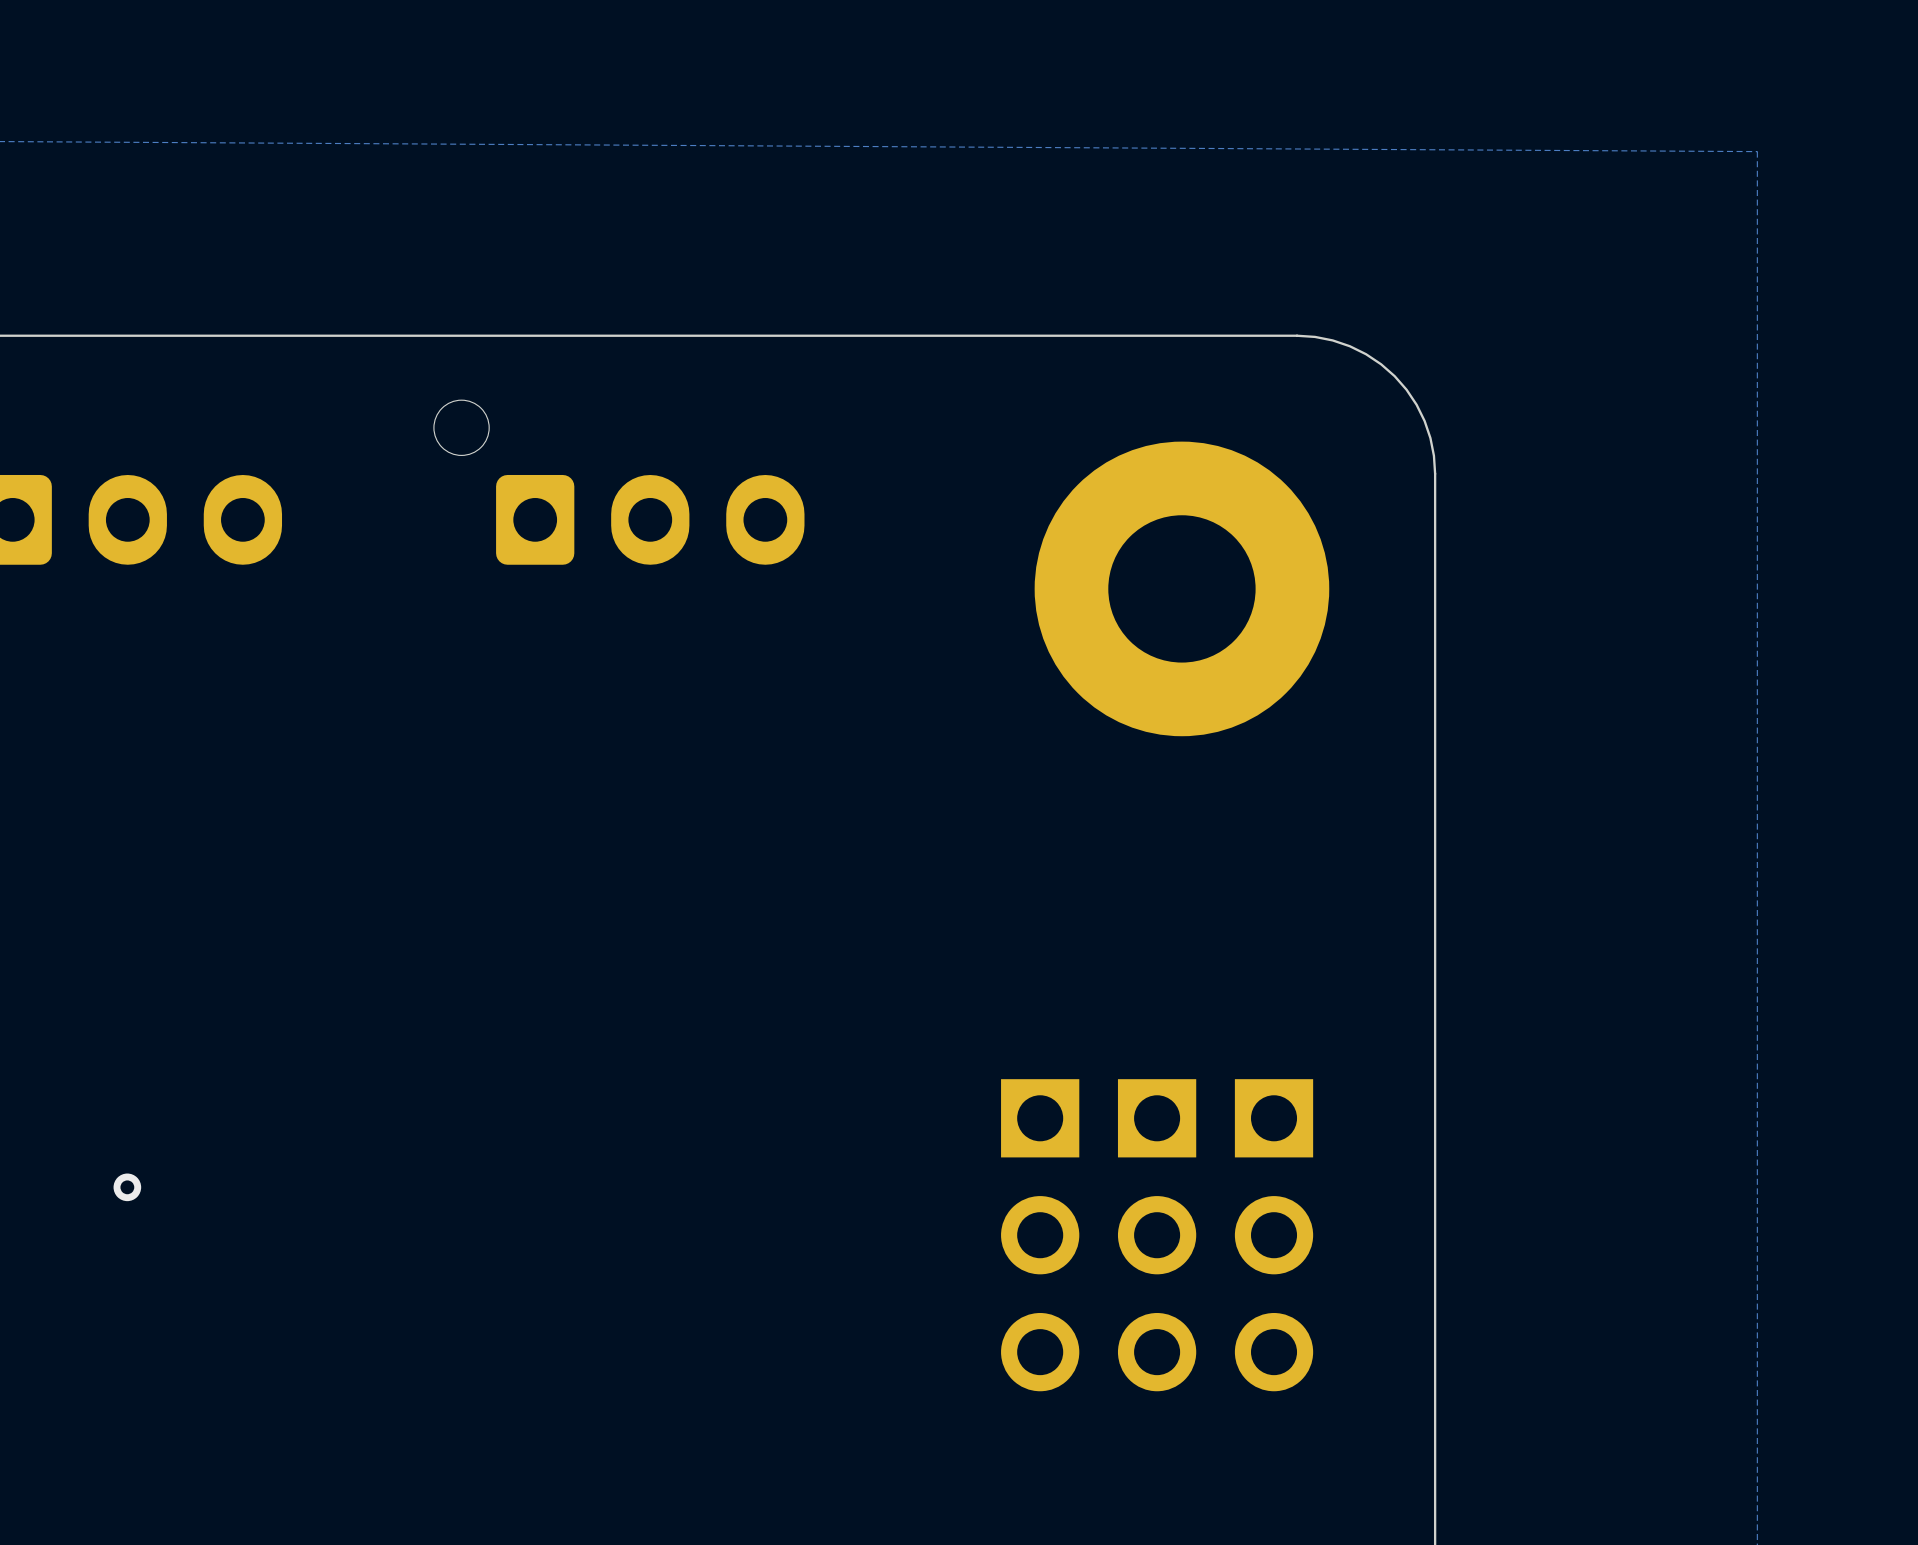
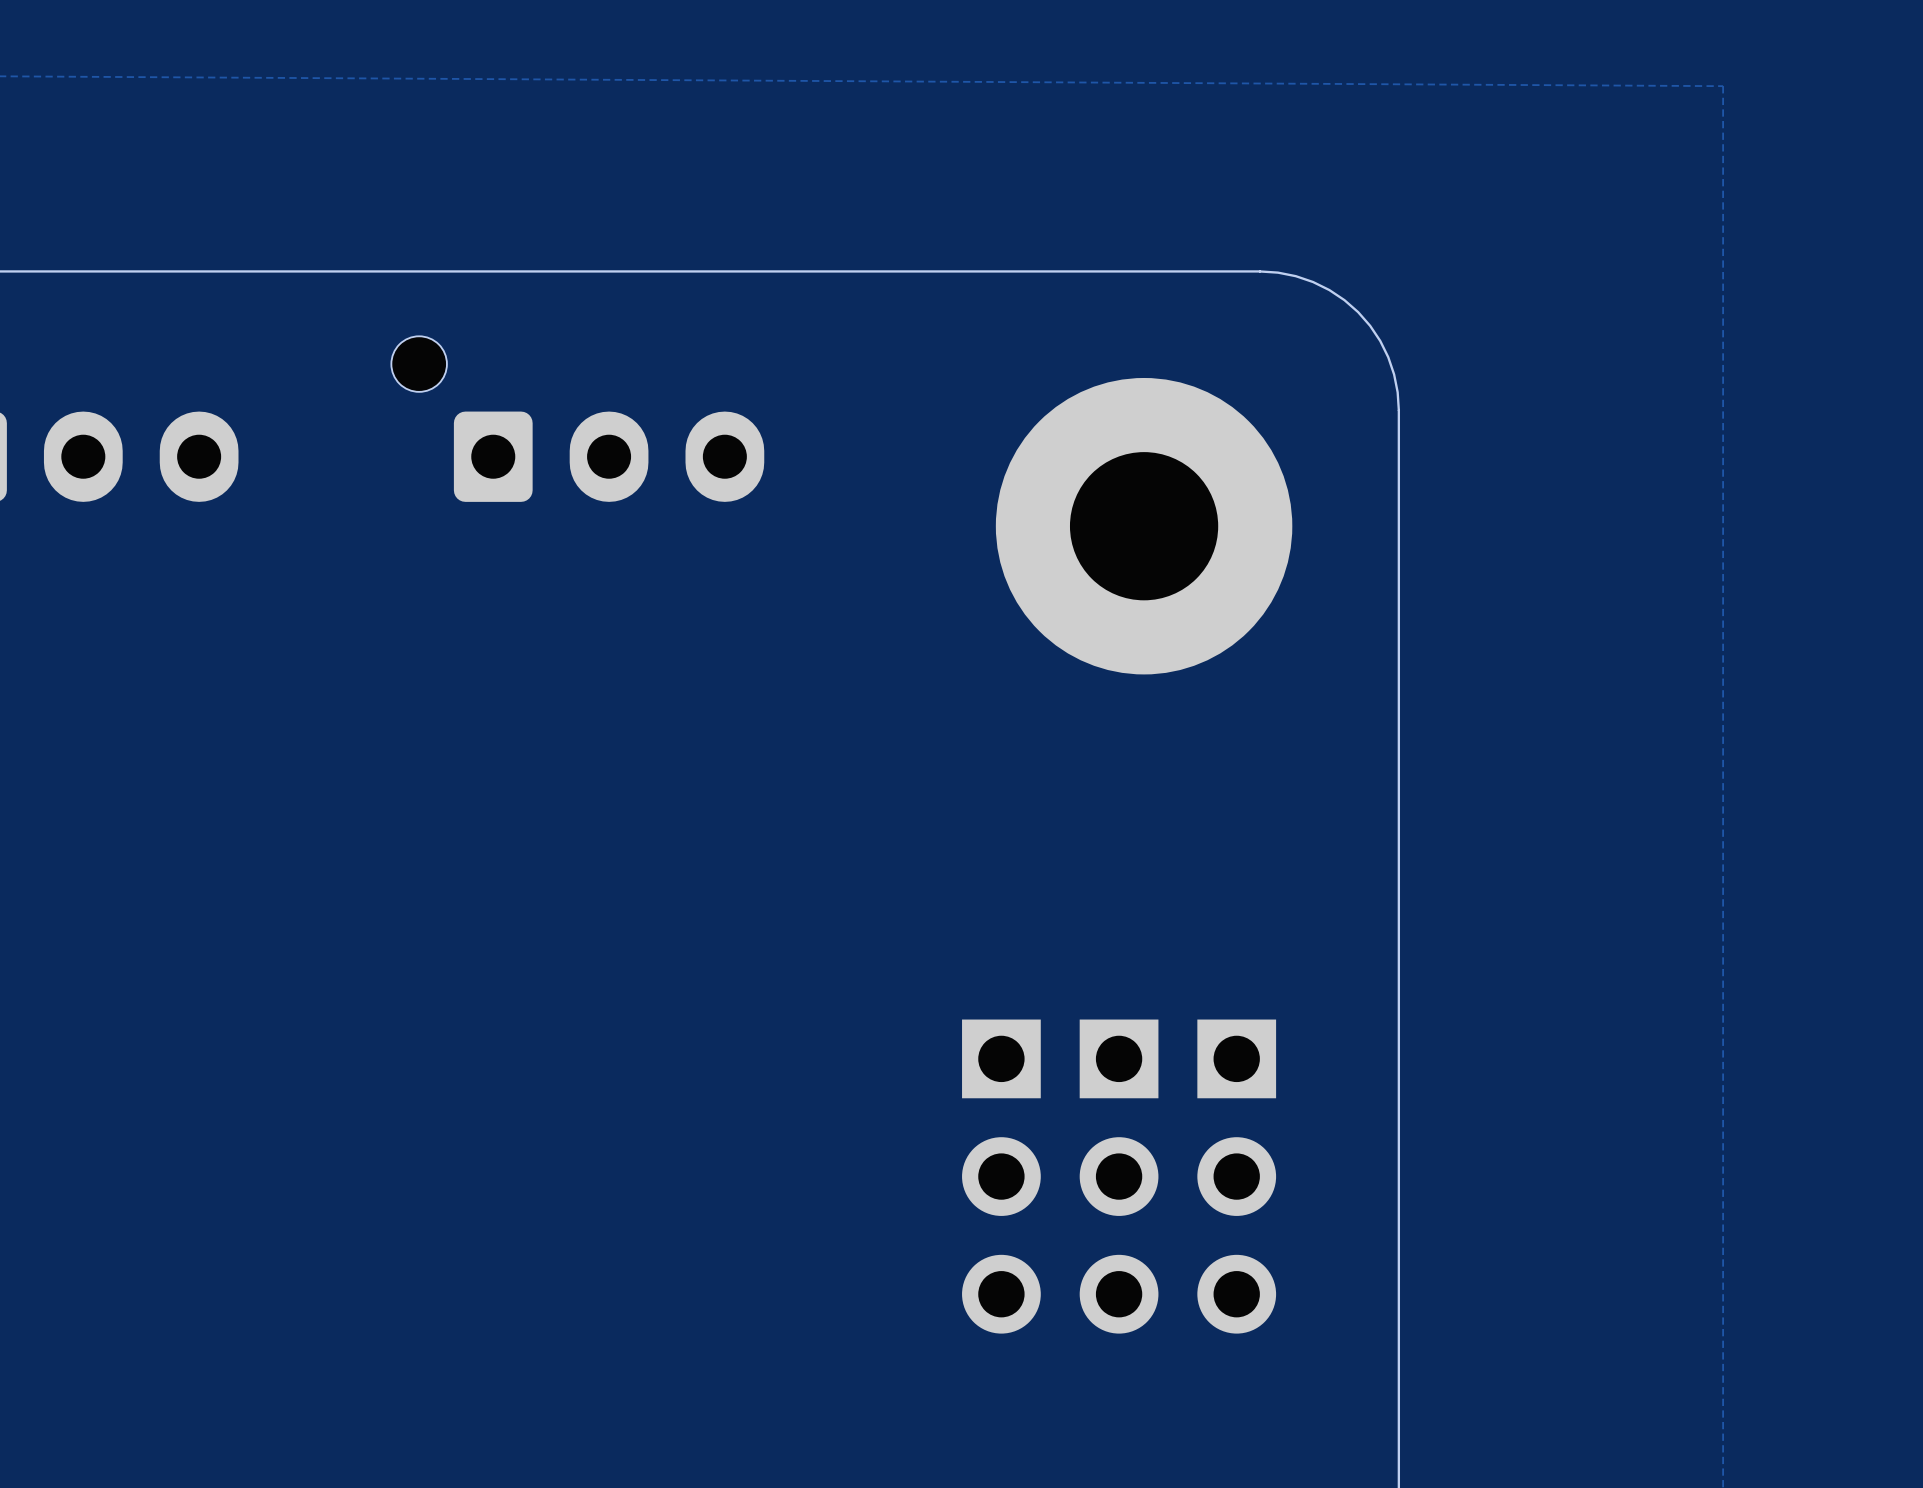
via: (127, 1187) -> none

